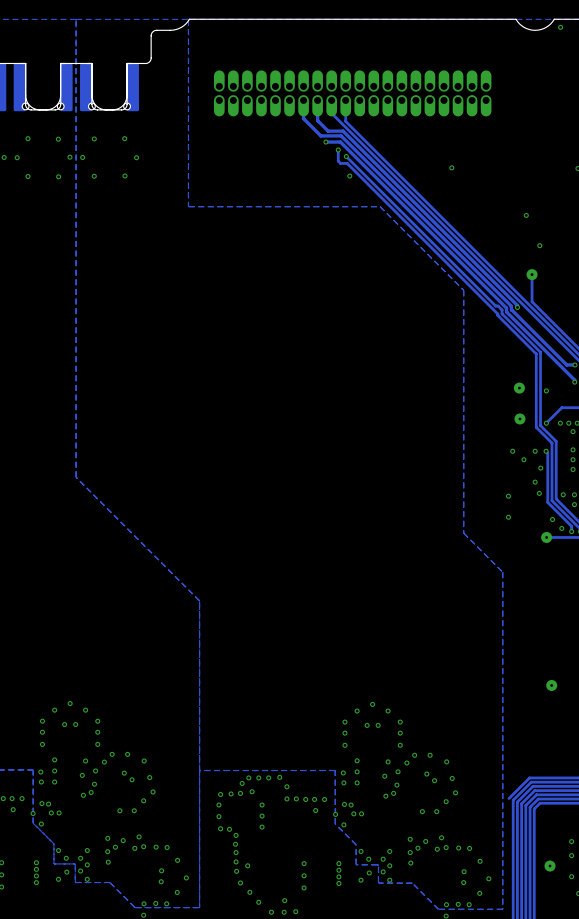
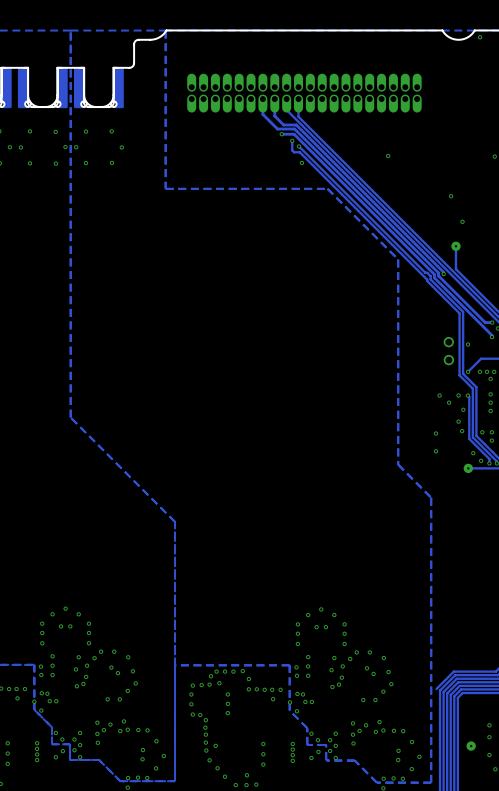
part footprint: [513, 382, 525, 394] -> [443, 336, 454, 348]
part footprint: [514, 413, 526, 425] -> [443, 354, 455, 366]
part: (551, 685) -> none

